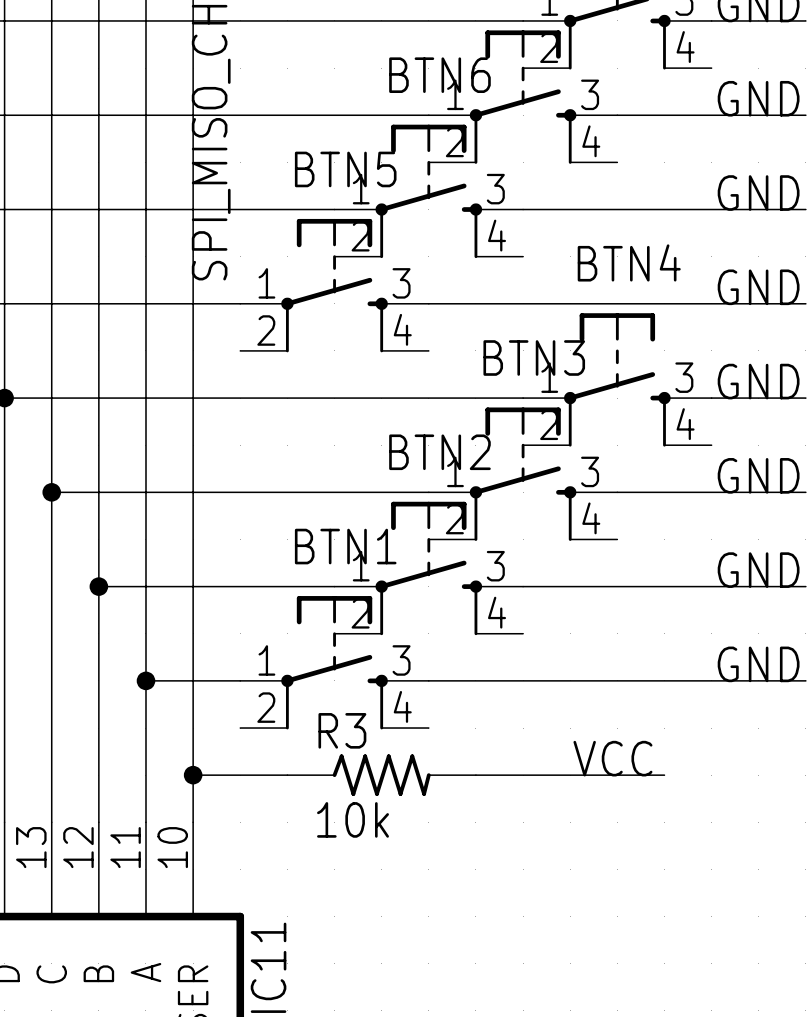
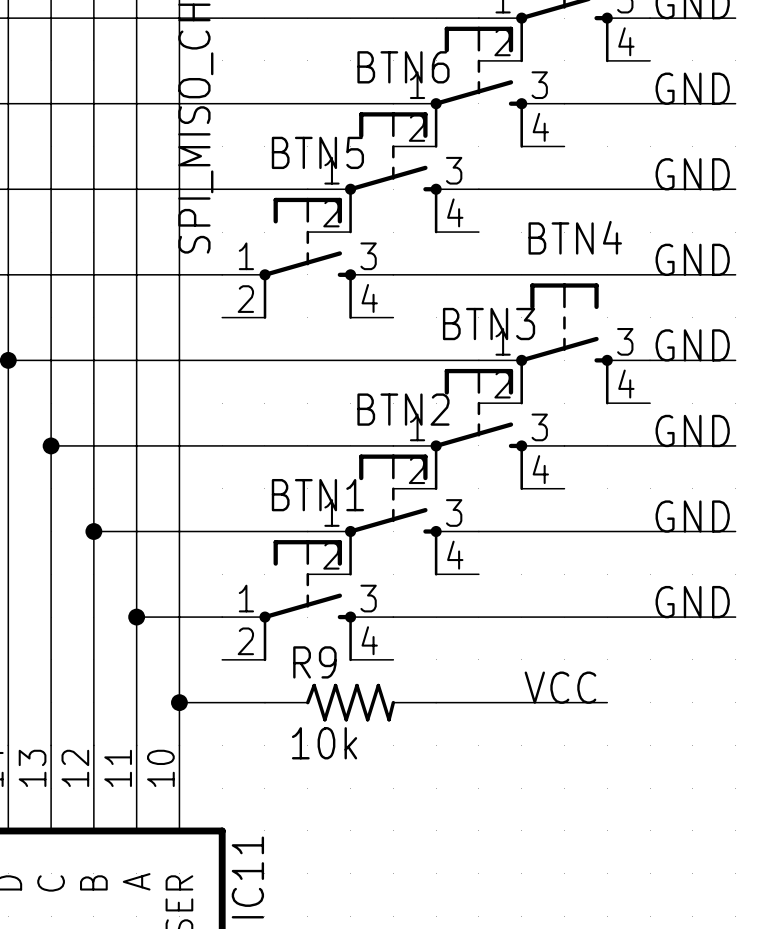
R3 name: R3 (342, 730) -> R9 (314, 662)

